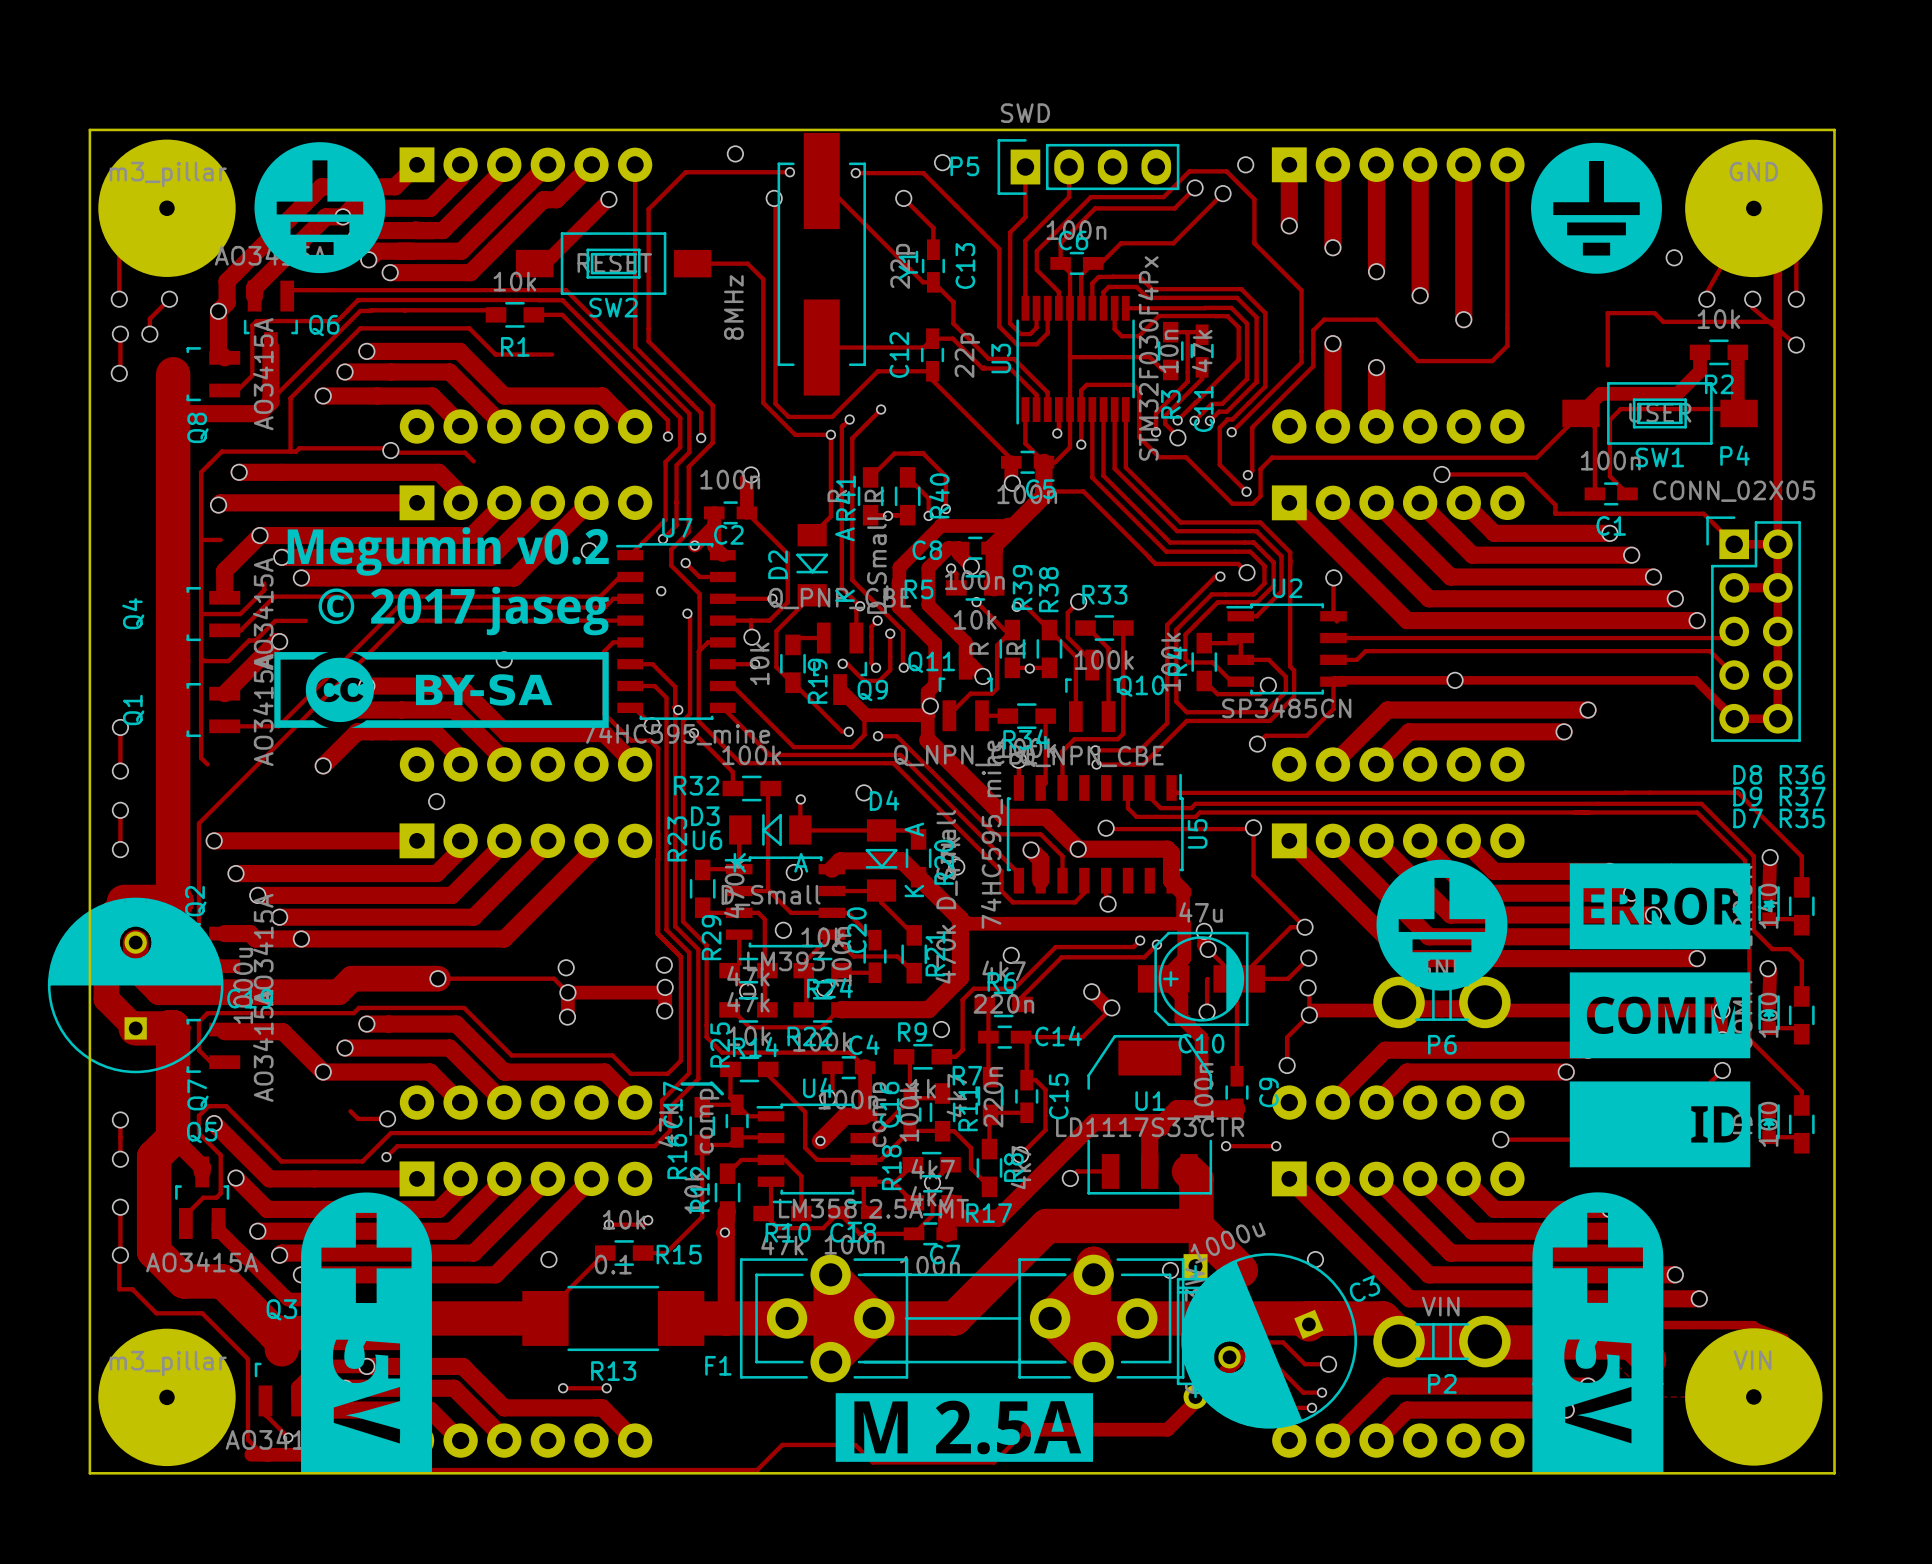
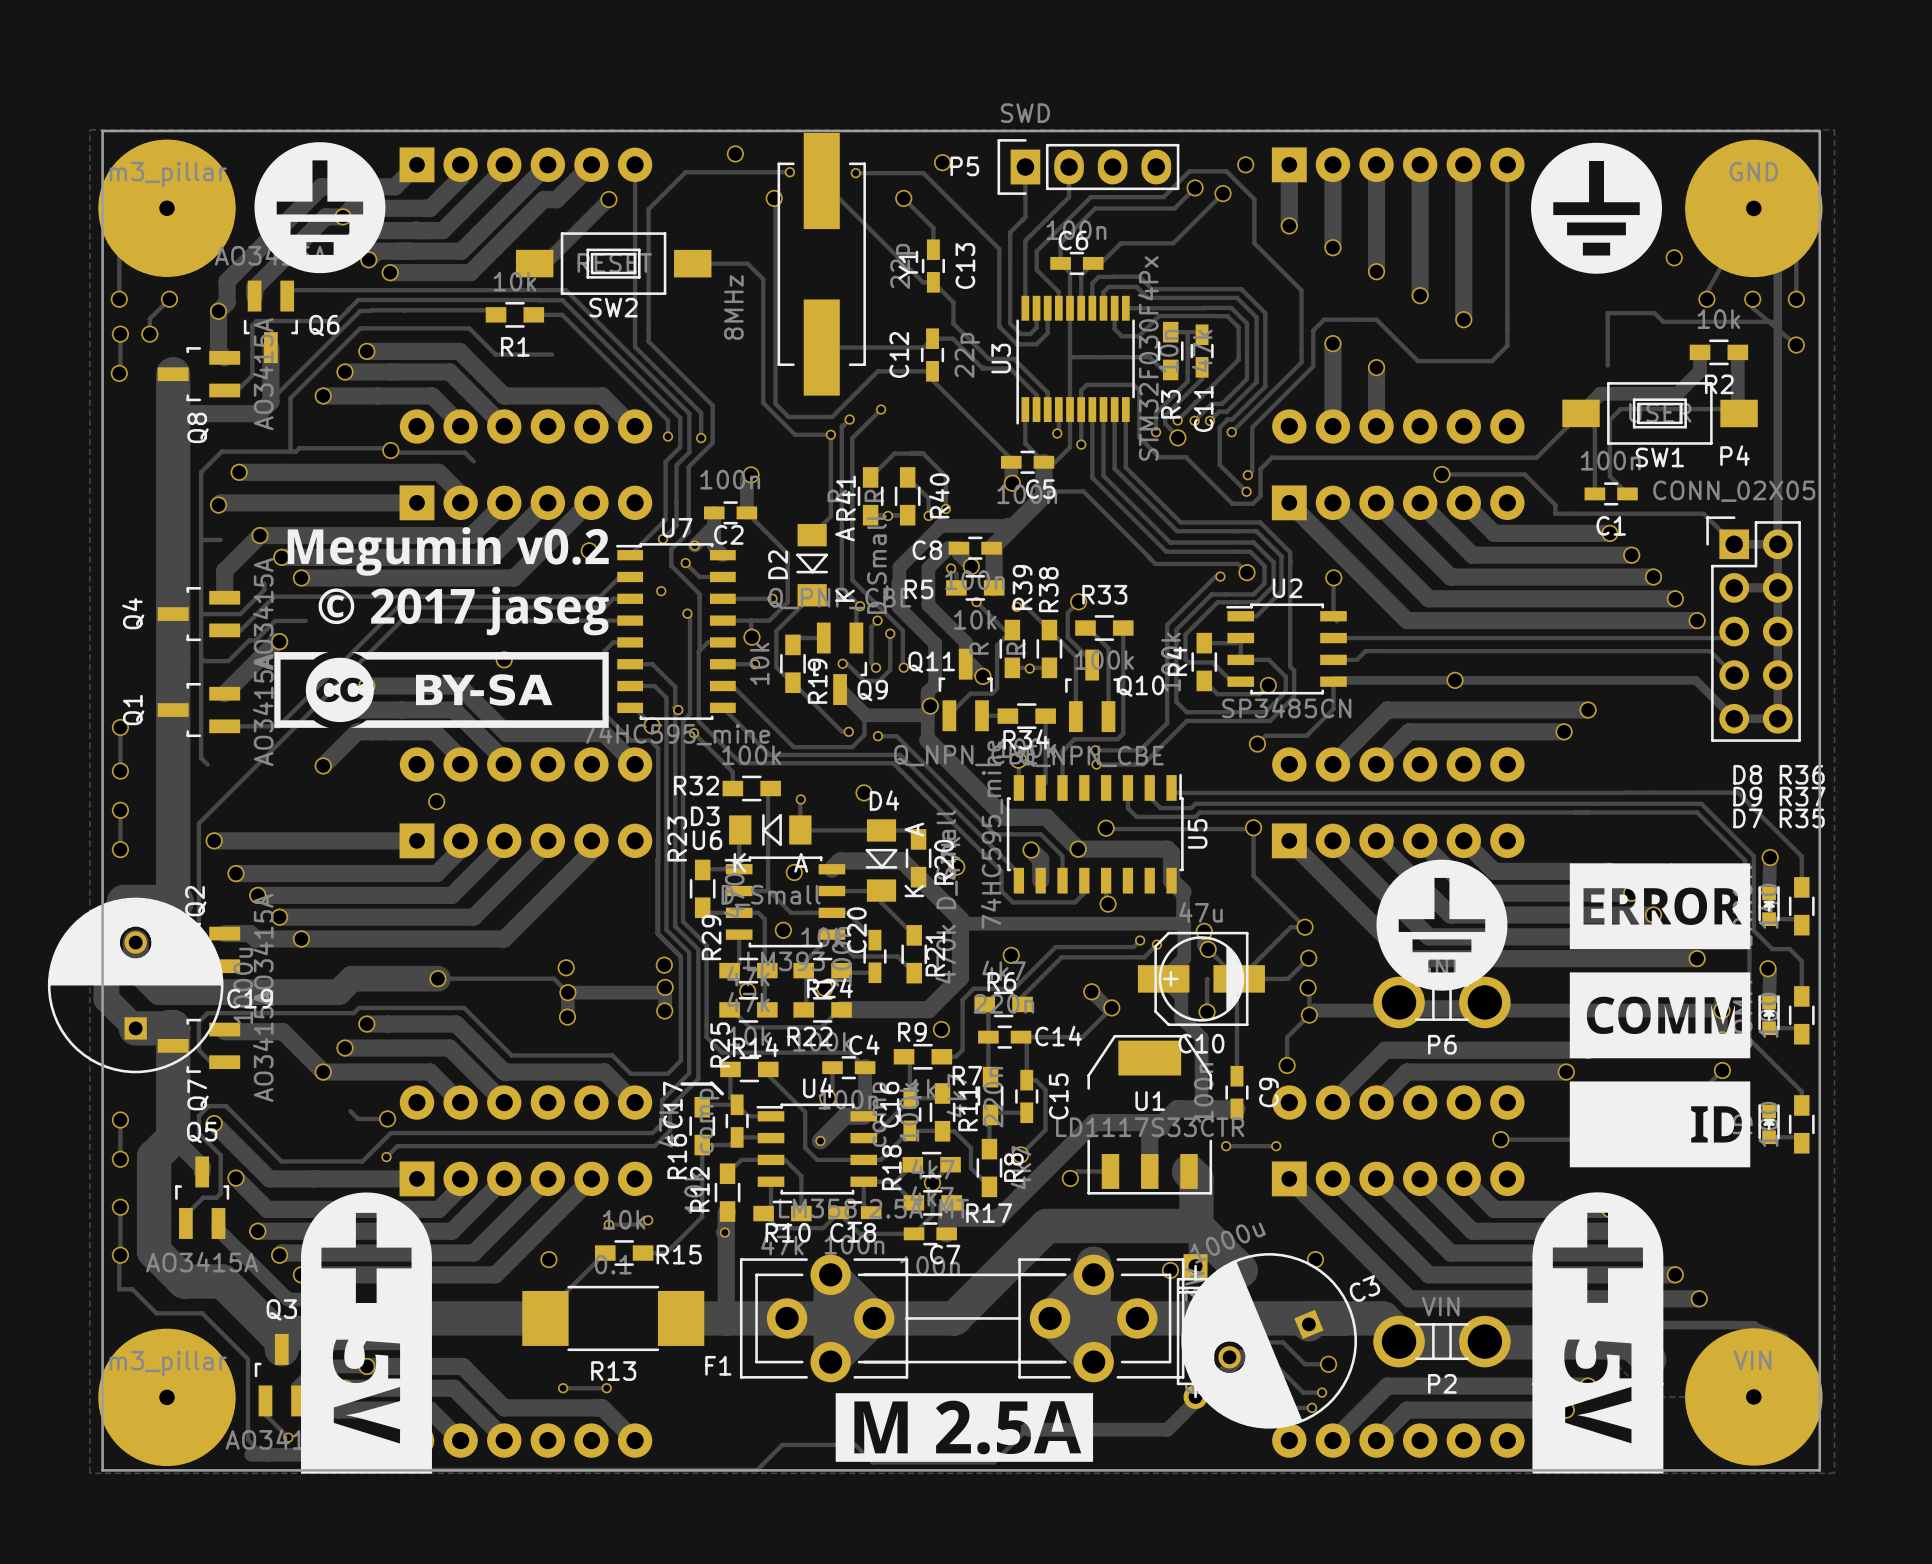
board edge: (89, 129) (89, 1473) (1834, 1473) (1834, 129) (89, 129) -> (102, 131) (102, 1470) (1819, 1470) (1819, 131) (102, 131)

